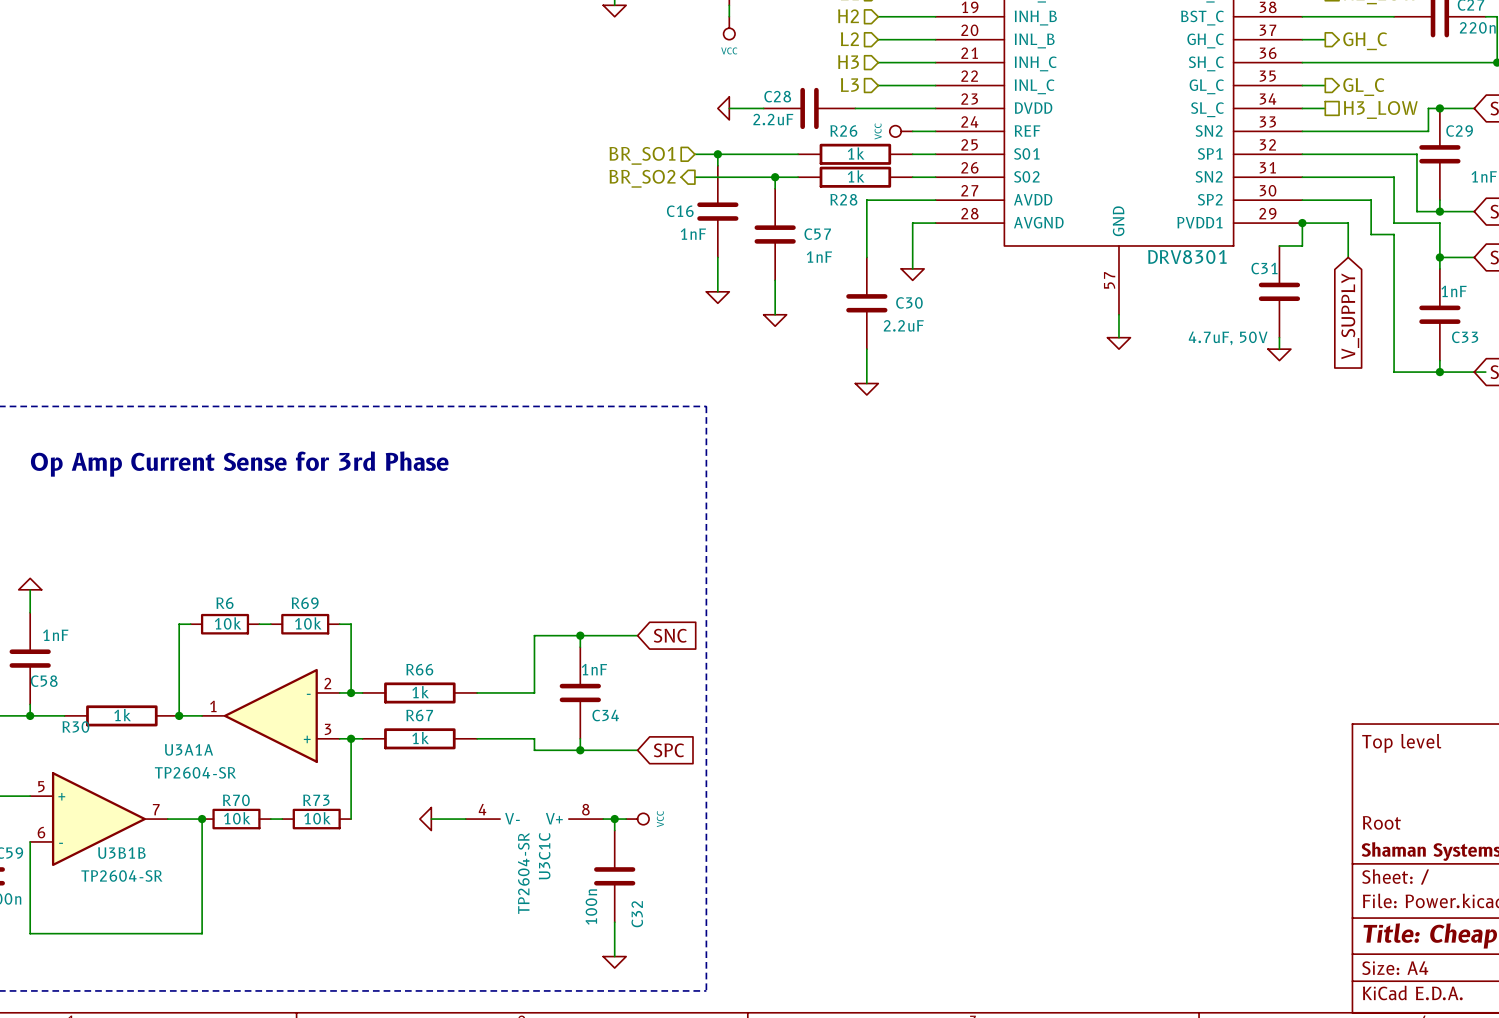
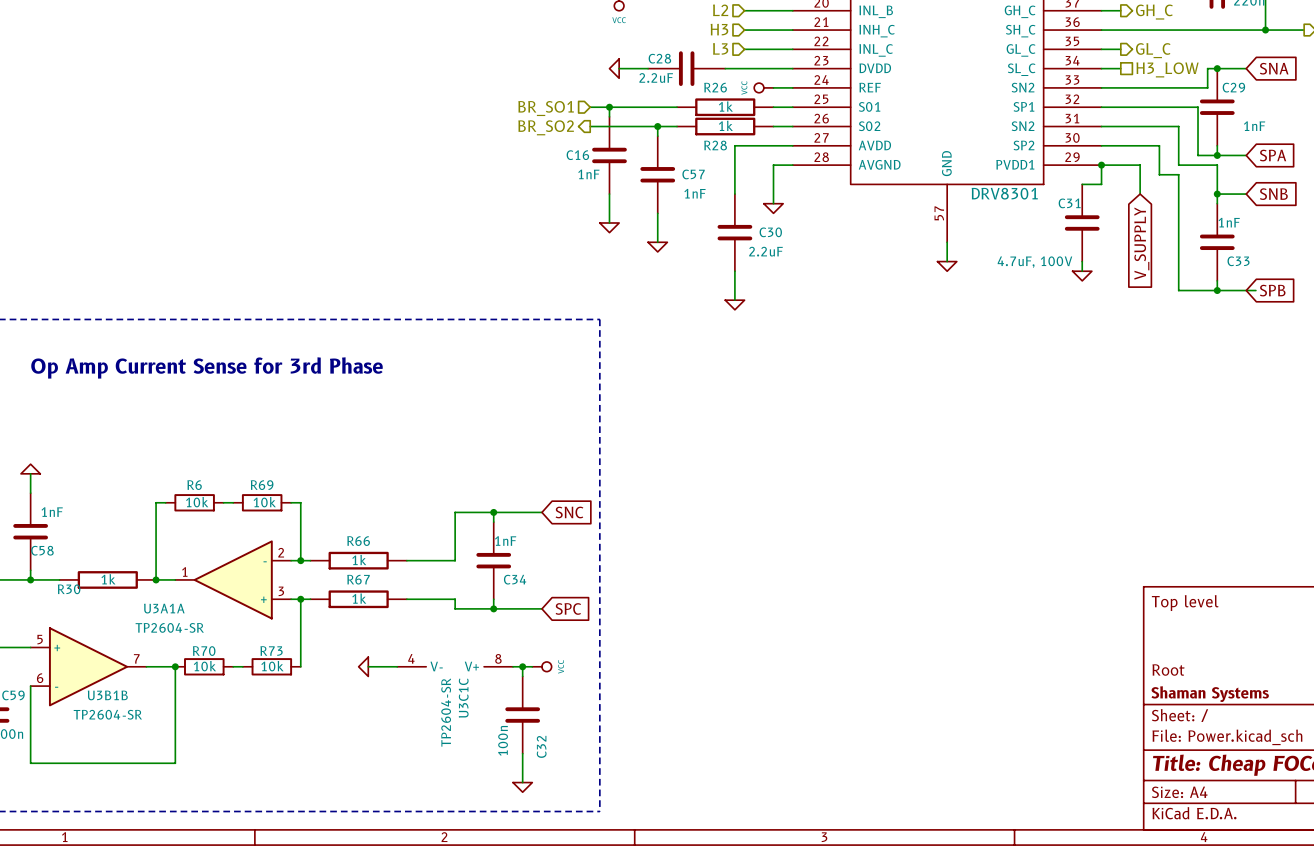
C31 value: 4.7uF, 50V (1228, 338) -> 4.7uF, 100V (1034, 262)

